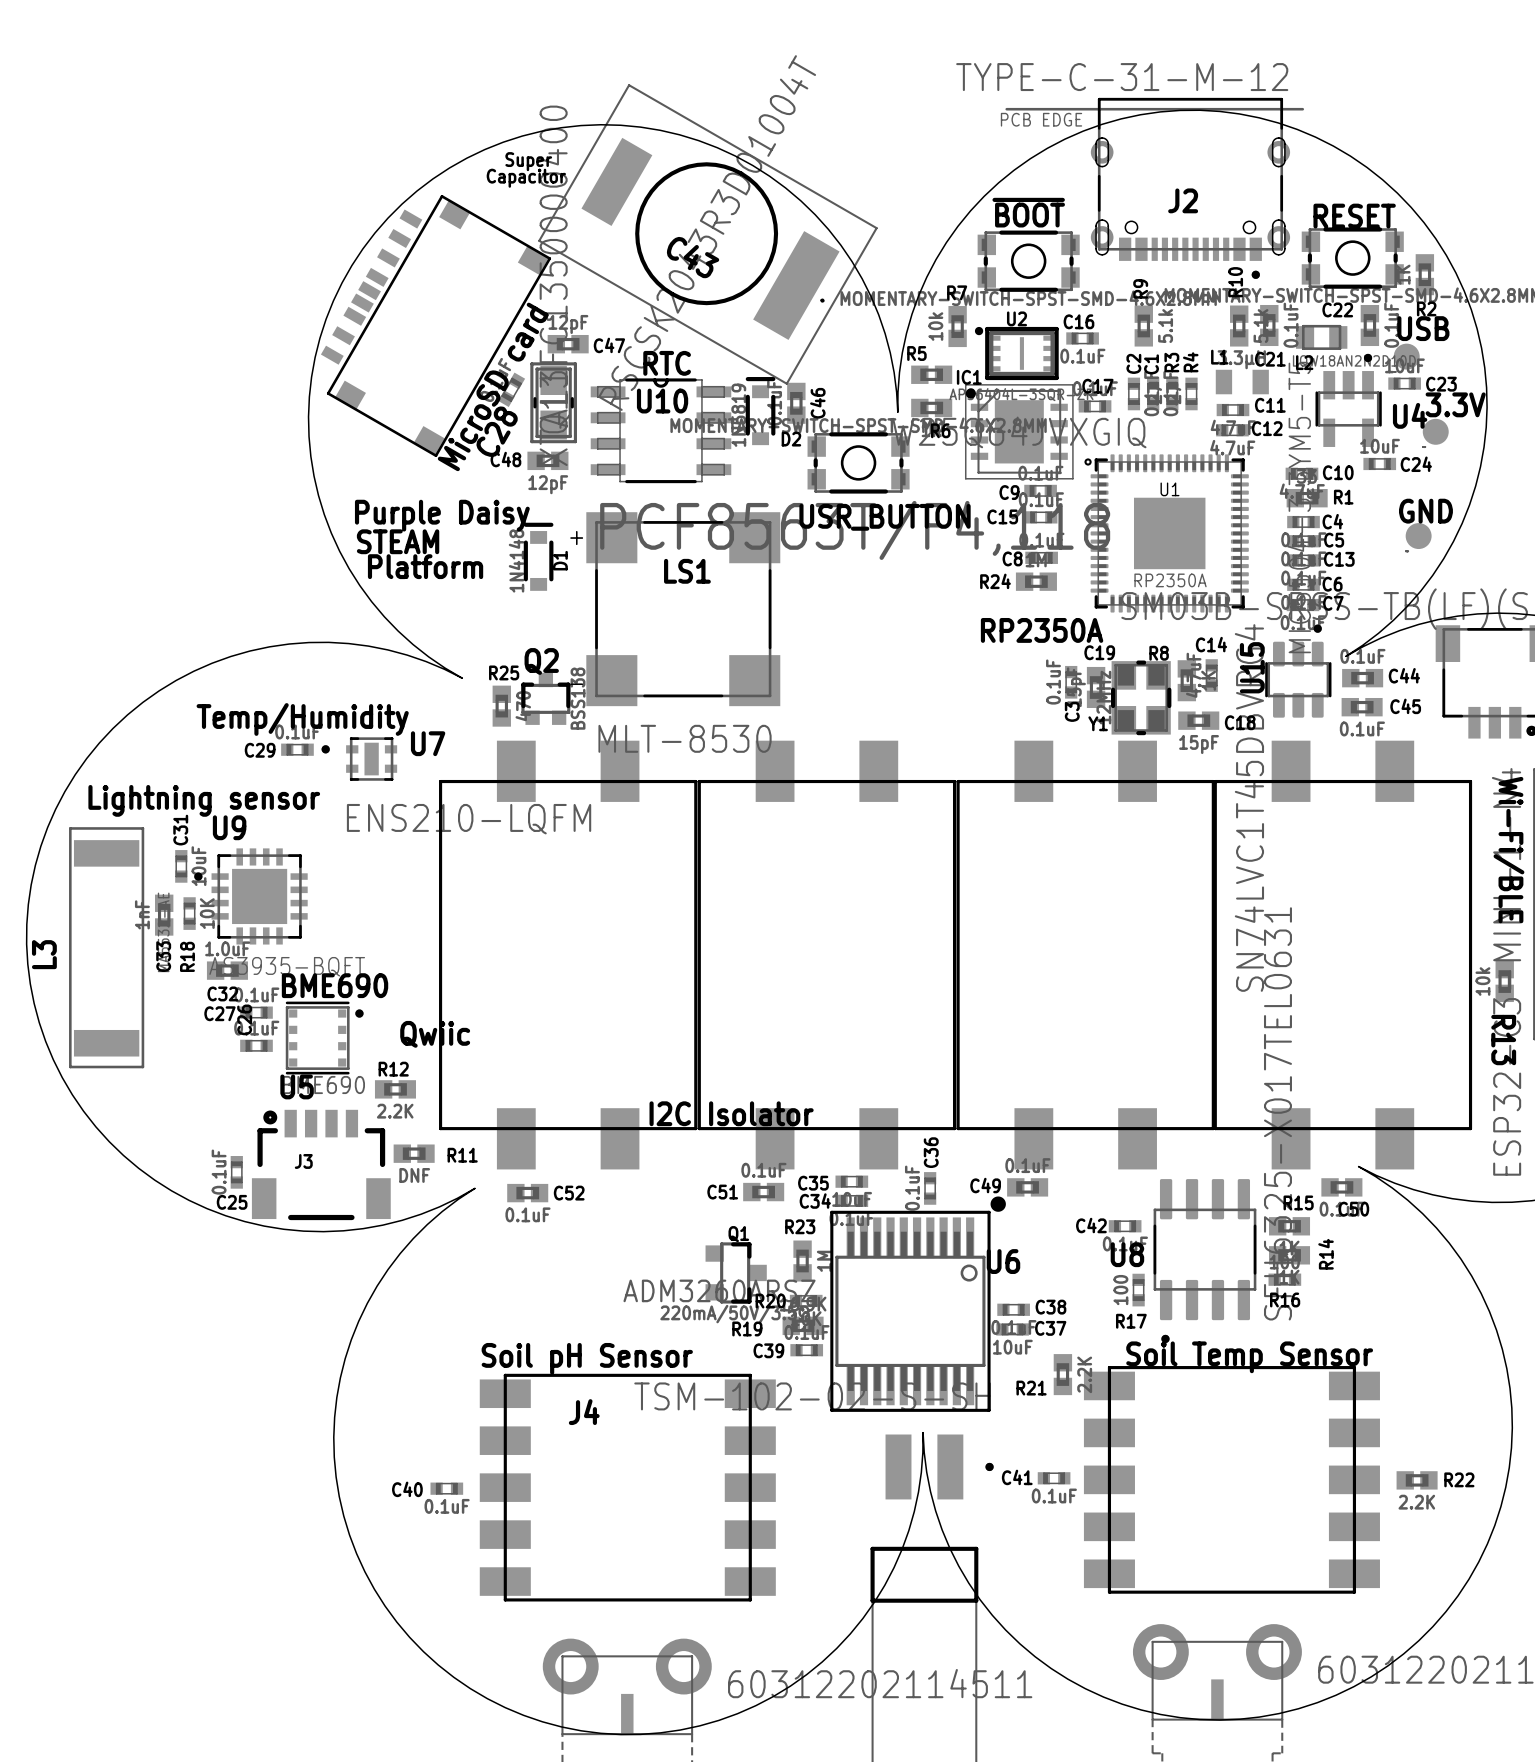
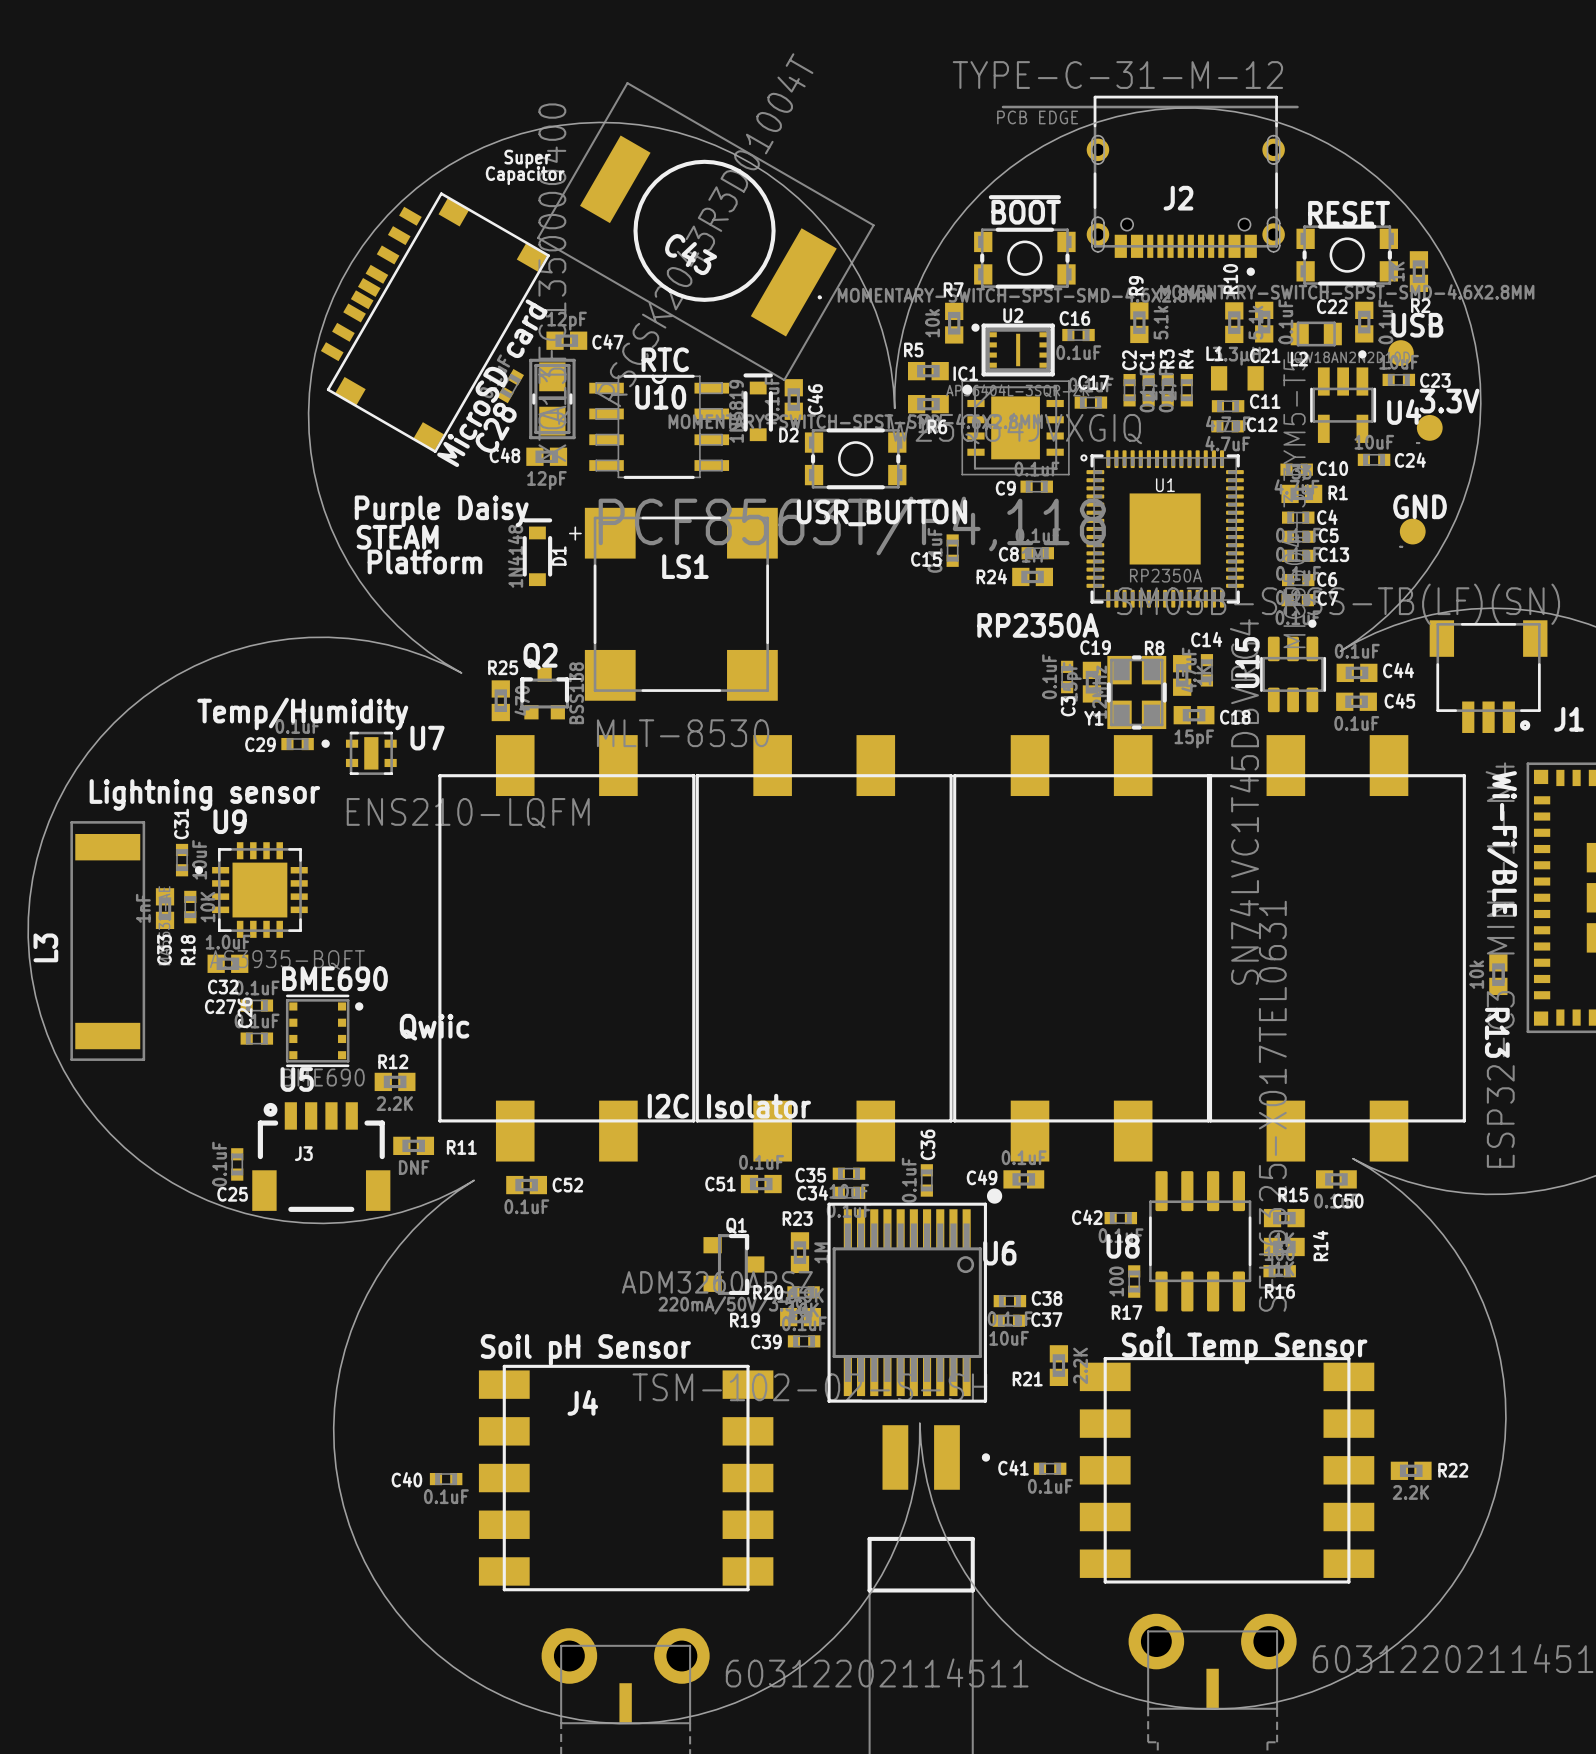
C15 rotation: 0° (1041, 517) -> 90° clockwise (952, 550)
C15 position: (1041, 517) -> (952, 550)

